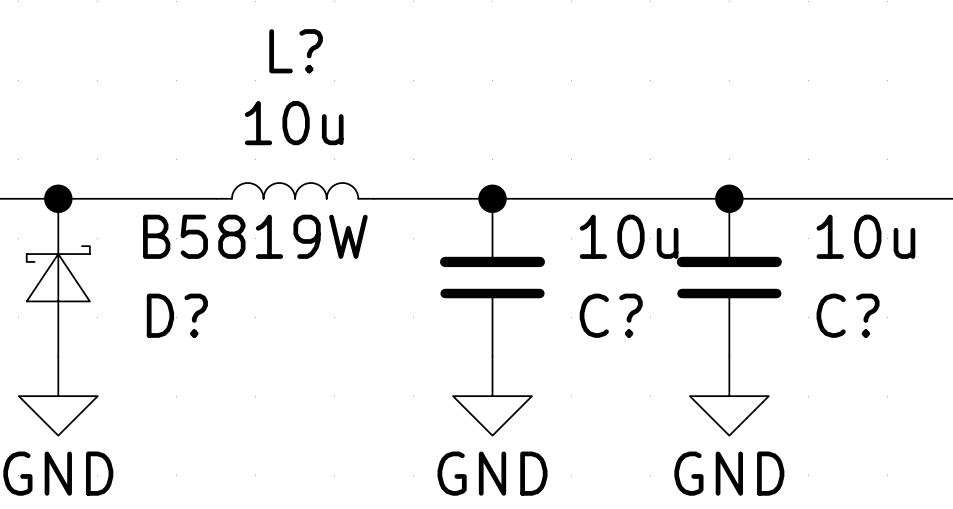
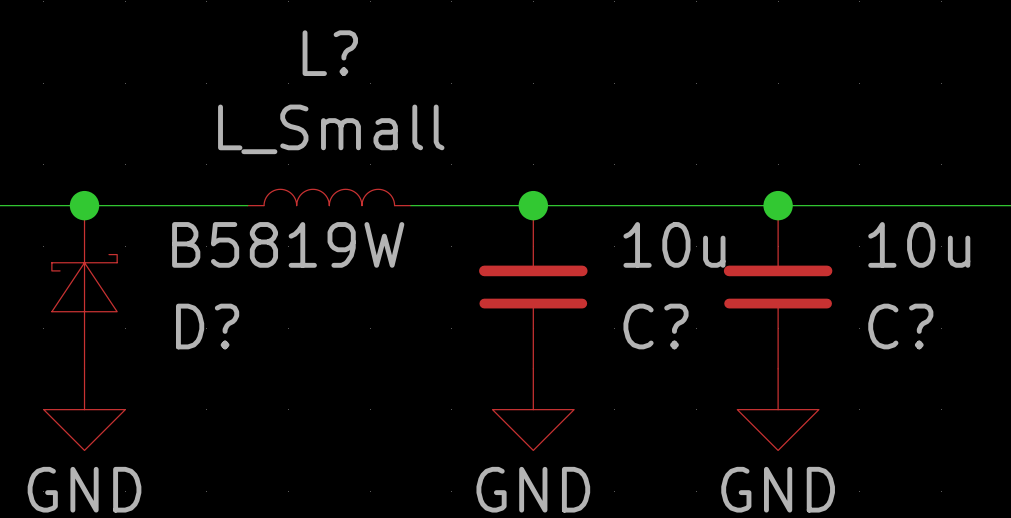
L? value: 10u (294, 123) -> L_Small (331, 129)

